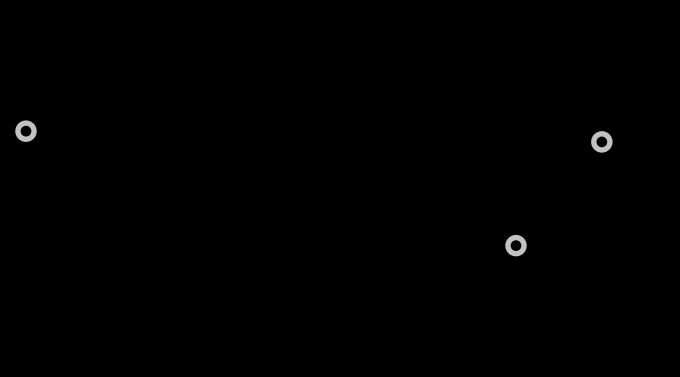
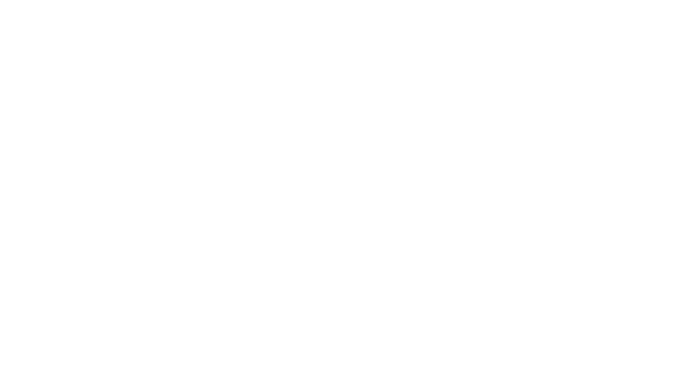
via: (25, 131) -> none
via: (601, 141) -> none
via: (516, 245) -> none

